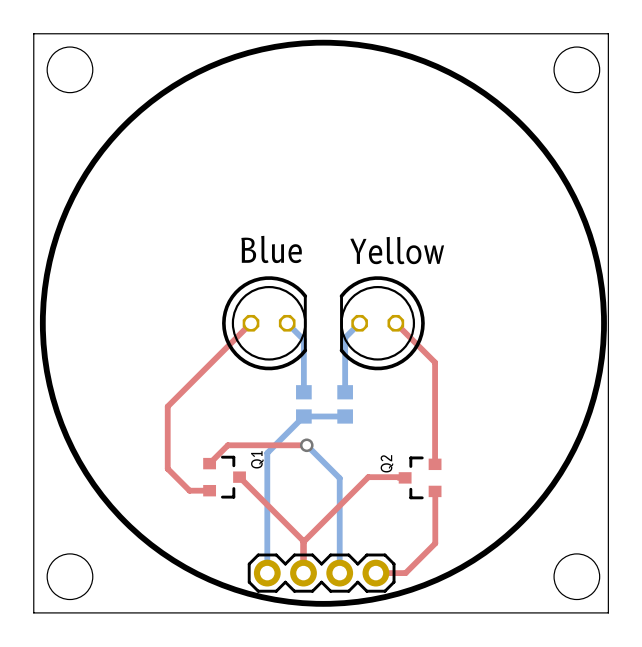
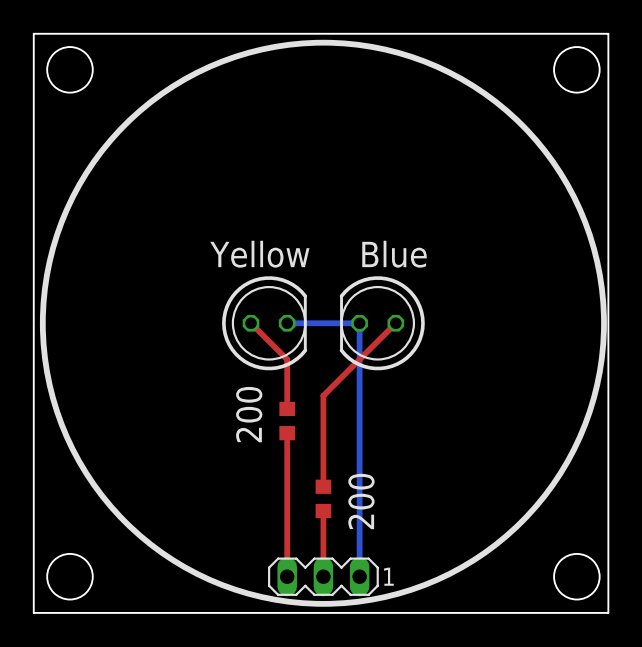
text position: Blue (271, 249) -> Blue (394, 254)
text position: Yellow (397, 250) -> Yellow (259, 254)
top track: (251, 323) (167, 406) (167, 468) (189, 490) (209, 490) -> (251, 323) (287, 359) (287, 408)
bottom track: (287, 323) (303, 339) (303, 392) -> (287, 323) (359, 323) (359, 576)
bottom track: (359, 323) (345, 337) (345, 392) -> none
top track: (395, 323) (435, 362) (435, 464) -> (395, 323) (323, 395) (323, 486)
part: (303, 404) -> none
part: (345, 404) -> none
text: none -> 200 (249, 414)
bottom track: (345, 416) (303, 416) (267, 453) (267, 573) -> none
part: none -> (287, 421)
top track: none -> (287, 433) (287, 576)
top track: (306, 445) (227, 445) (209, 463) -> none
bottom track: (306, 445) (339, 478) (339, 573) -> none
via: (306, 445) -> none
Q1: (224, 477) -> none
top track: (239, 477) (303, 541) (303, 573) -> none
top track: (398, 477) (405, 477) (368, 477) (303, 541) -> none
Q2: (420, 477) -> none
top track: (435, 491) (435, 543) (405, 573) (375, 573) -> none
part: none -> (323, 498)
text: none -> 200 (361, 501)
top track: none -> (323, 510) (323, 576)
part footprint: [247, 553, 396, 593] -> [268, 557, 379, 597]

